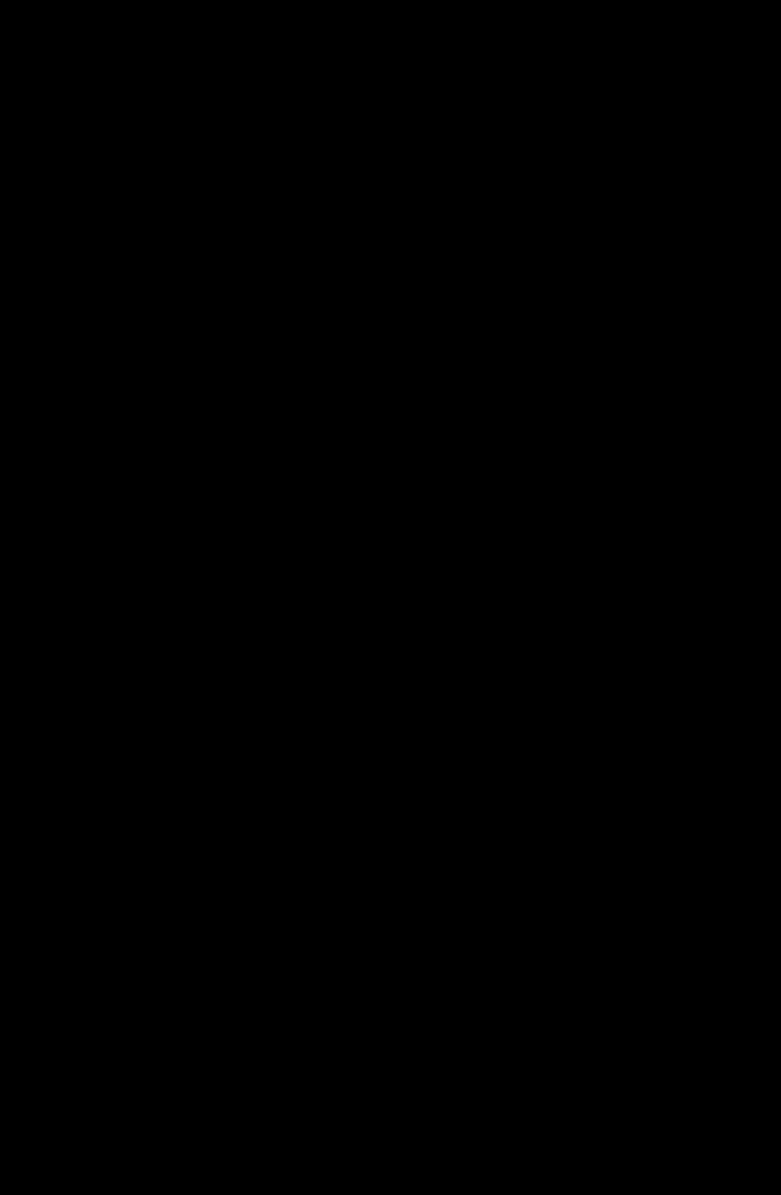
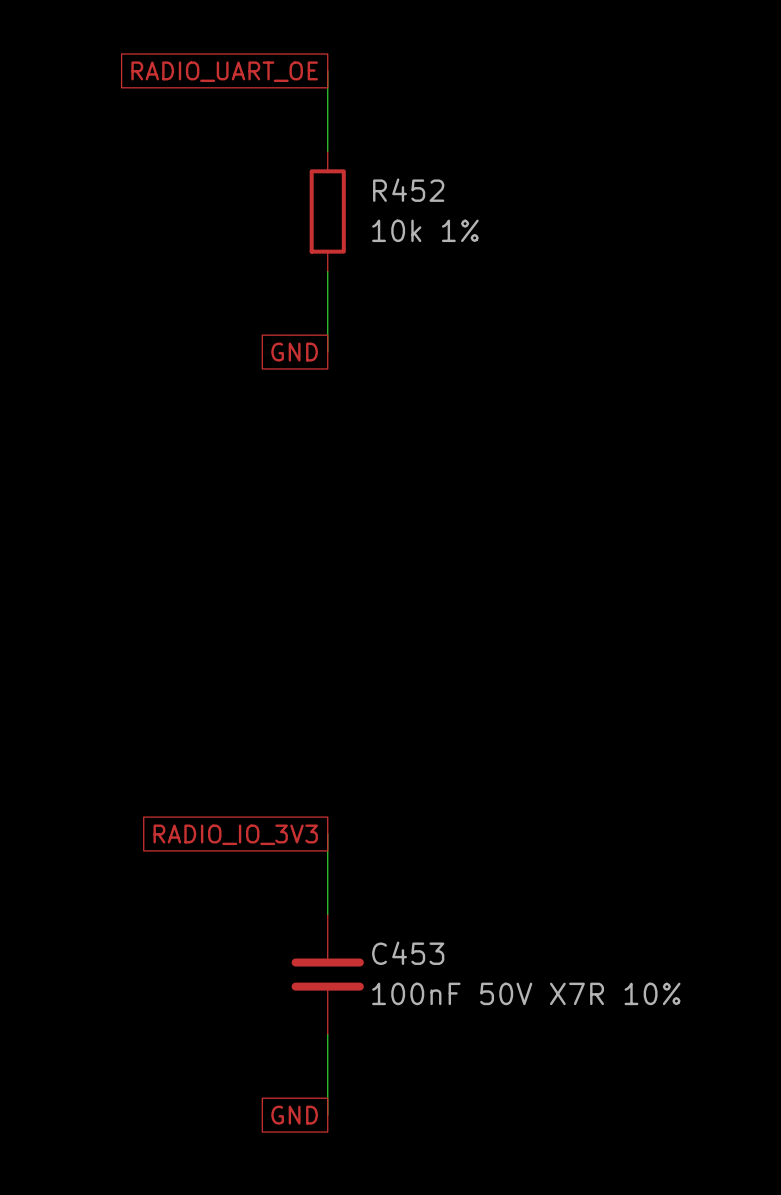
wire: none -> (327, 70) (327, 151)
global label: none -> RADIO_UART_OE (224, 71)
R452: none -> 10k 1% (327, 211)
wire: none -> (327, 271) (327, 352)
global label: none -> GND (294, 352)
global label: none -> RADIO_IO_3V3 (235, 834)
wire: none -> (327, 834) (327, 914)
C453: none -> 100nF 50V X7R 10% (327, 974)
wire: none -> (327, 1034) (327, 1115)
global label: none -> GND (294, 1115)

